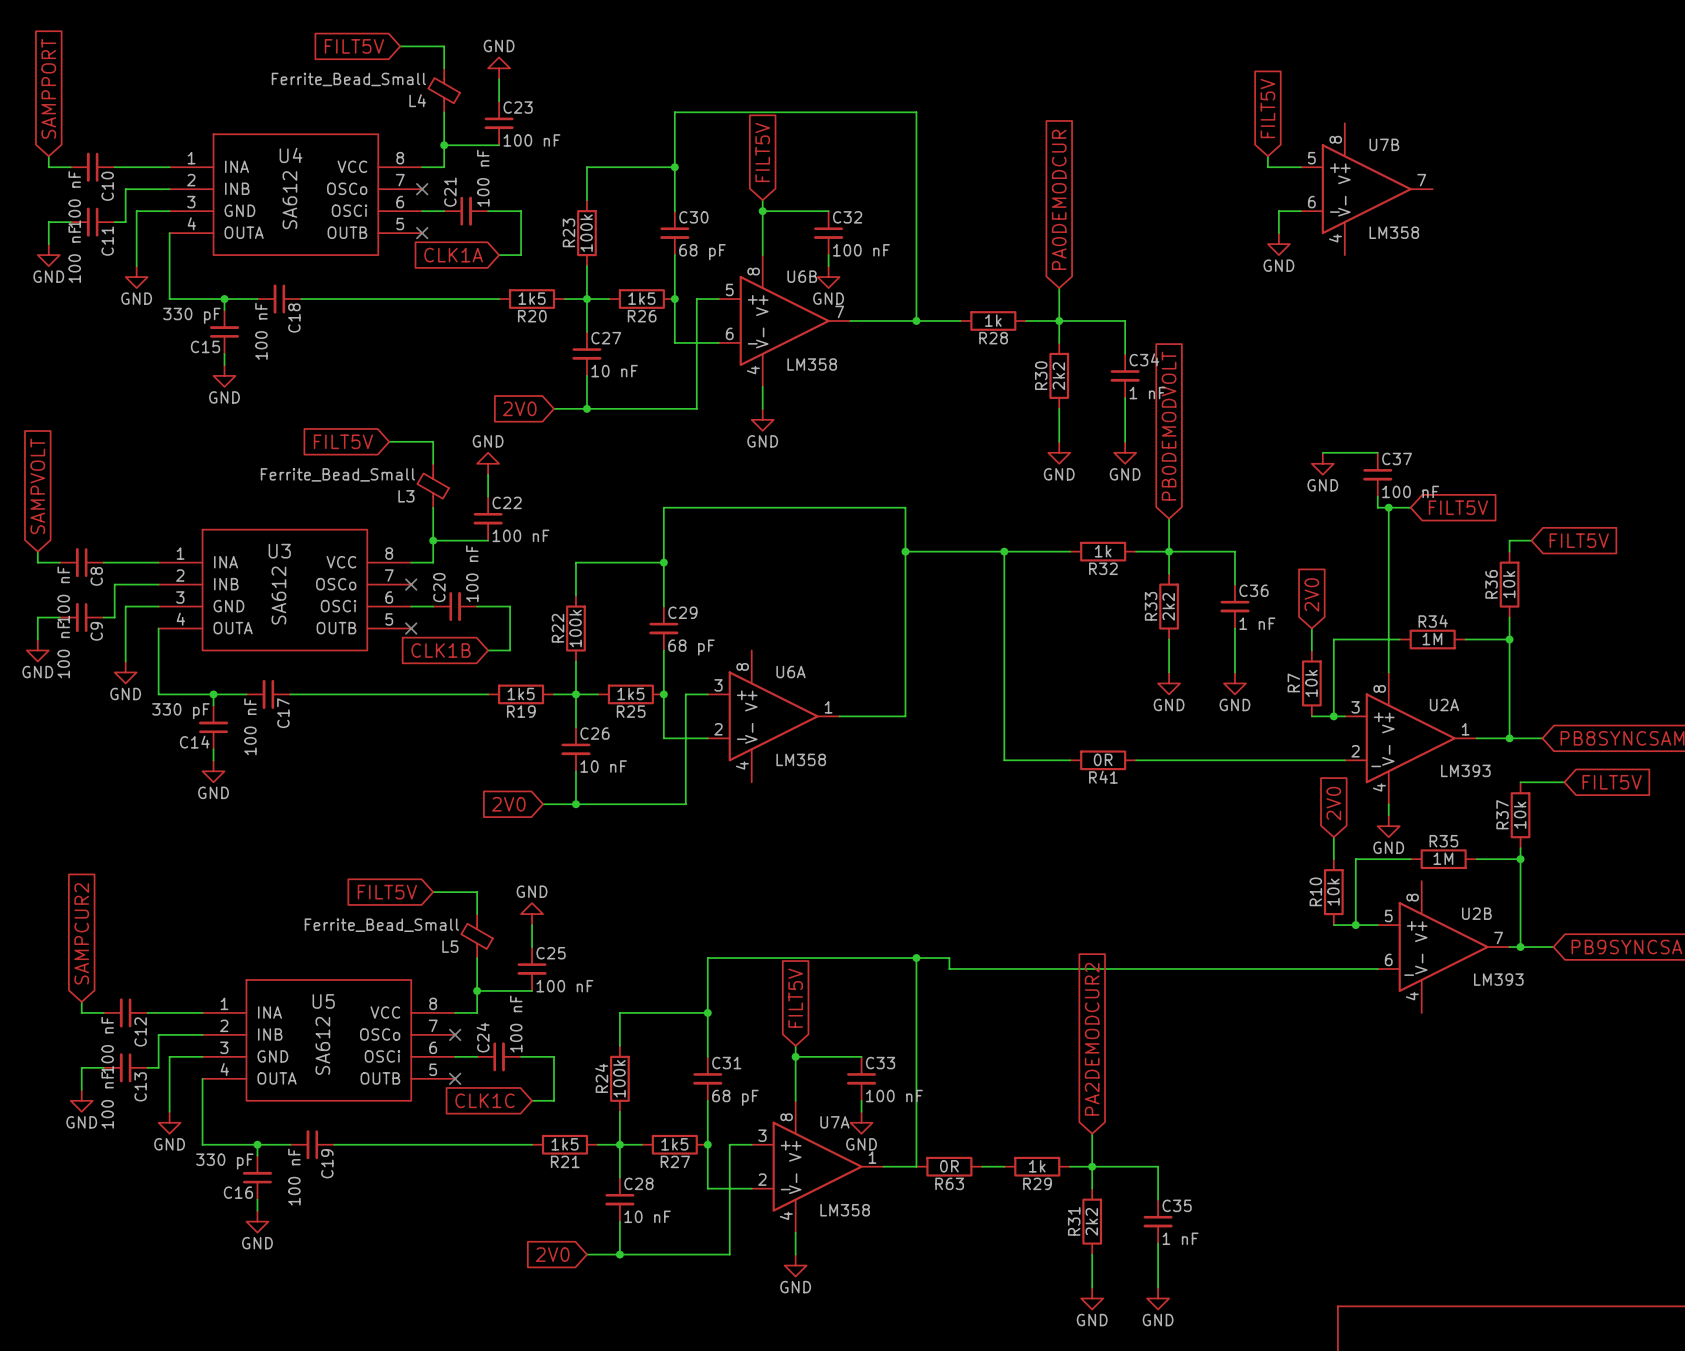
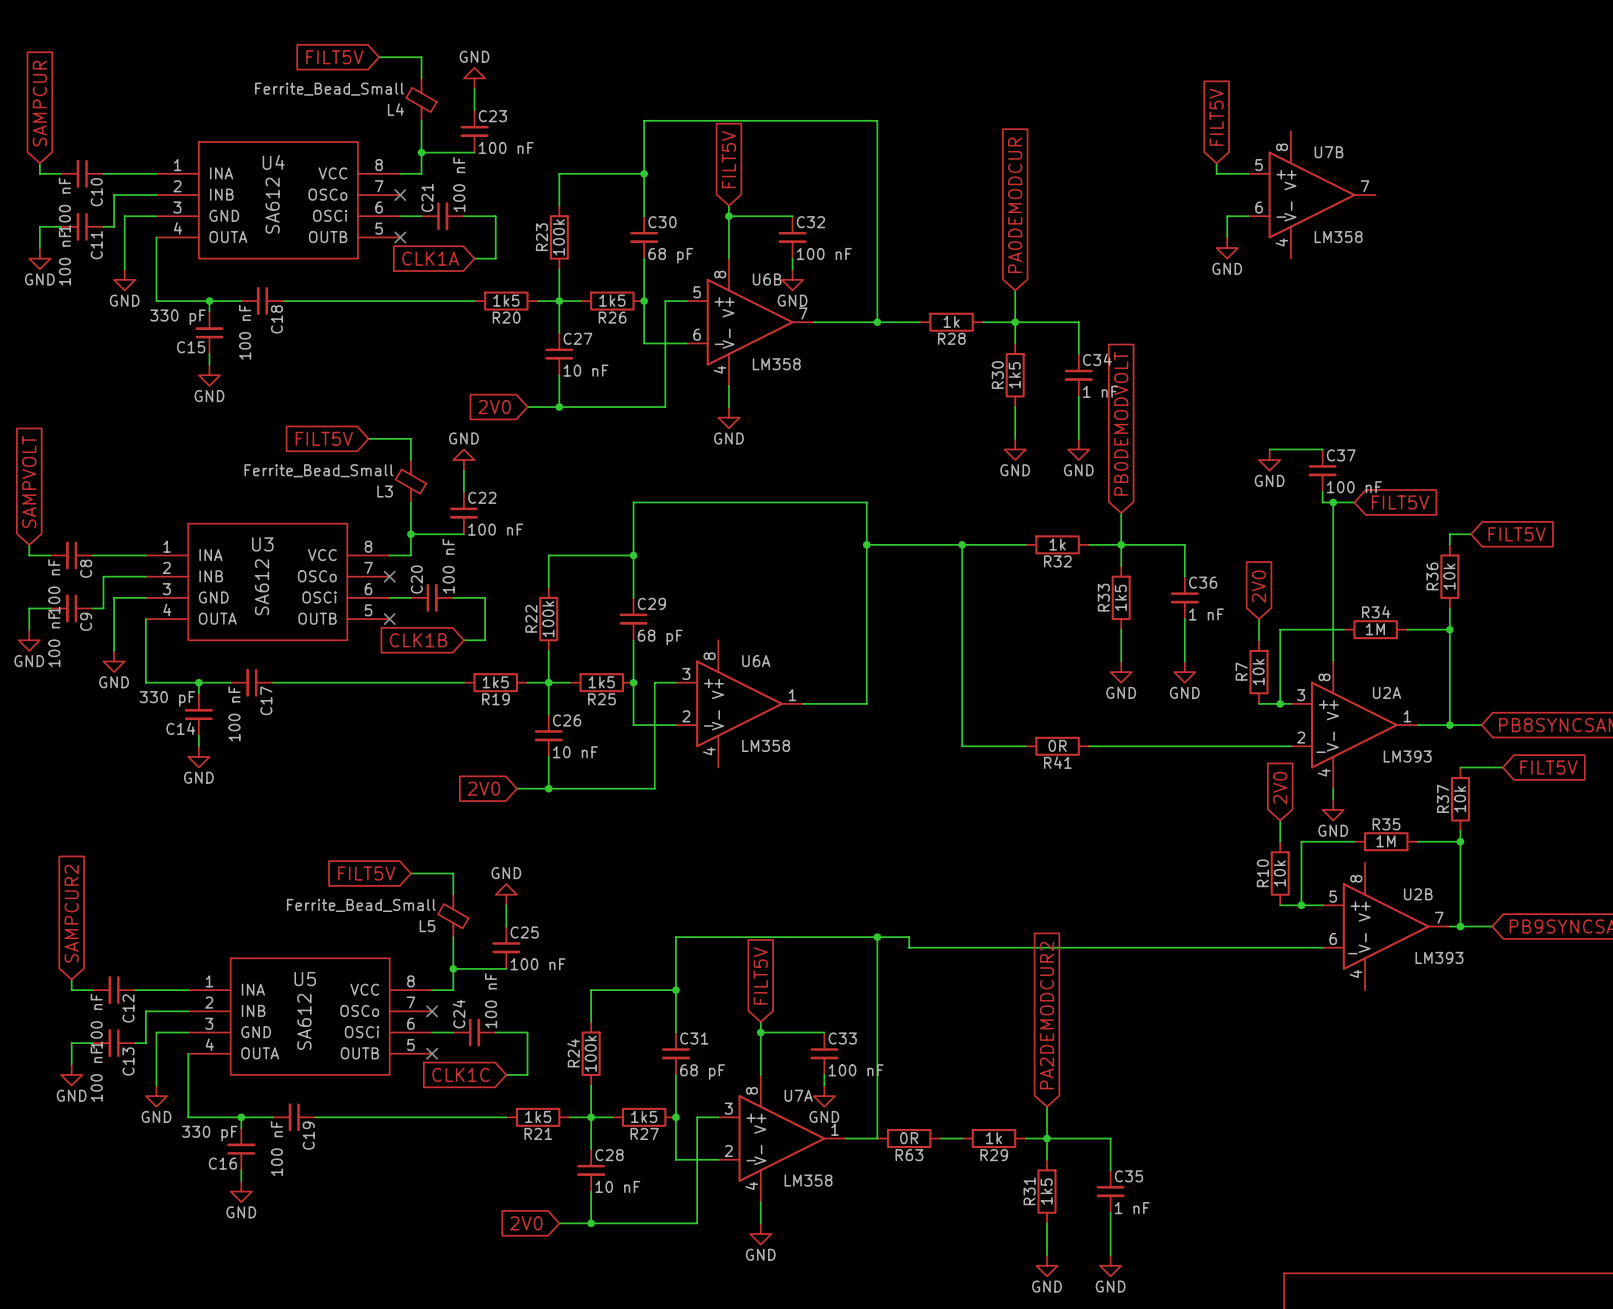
global label: SAMPPORT (48, 88) -> SAMPCUR (39, 103)
R30 value: 2k2 (1058, 376) -> 1k5 (1014, 375)
R33 value: 2k2 (1168, 606) -> 1k5 (1120, 597)
R31 value: 2k2 (1091, 1221) -> 1k5 (1046, 1191)

